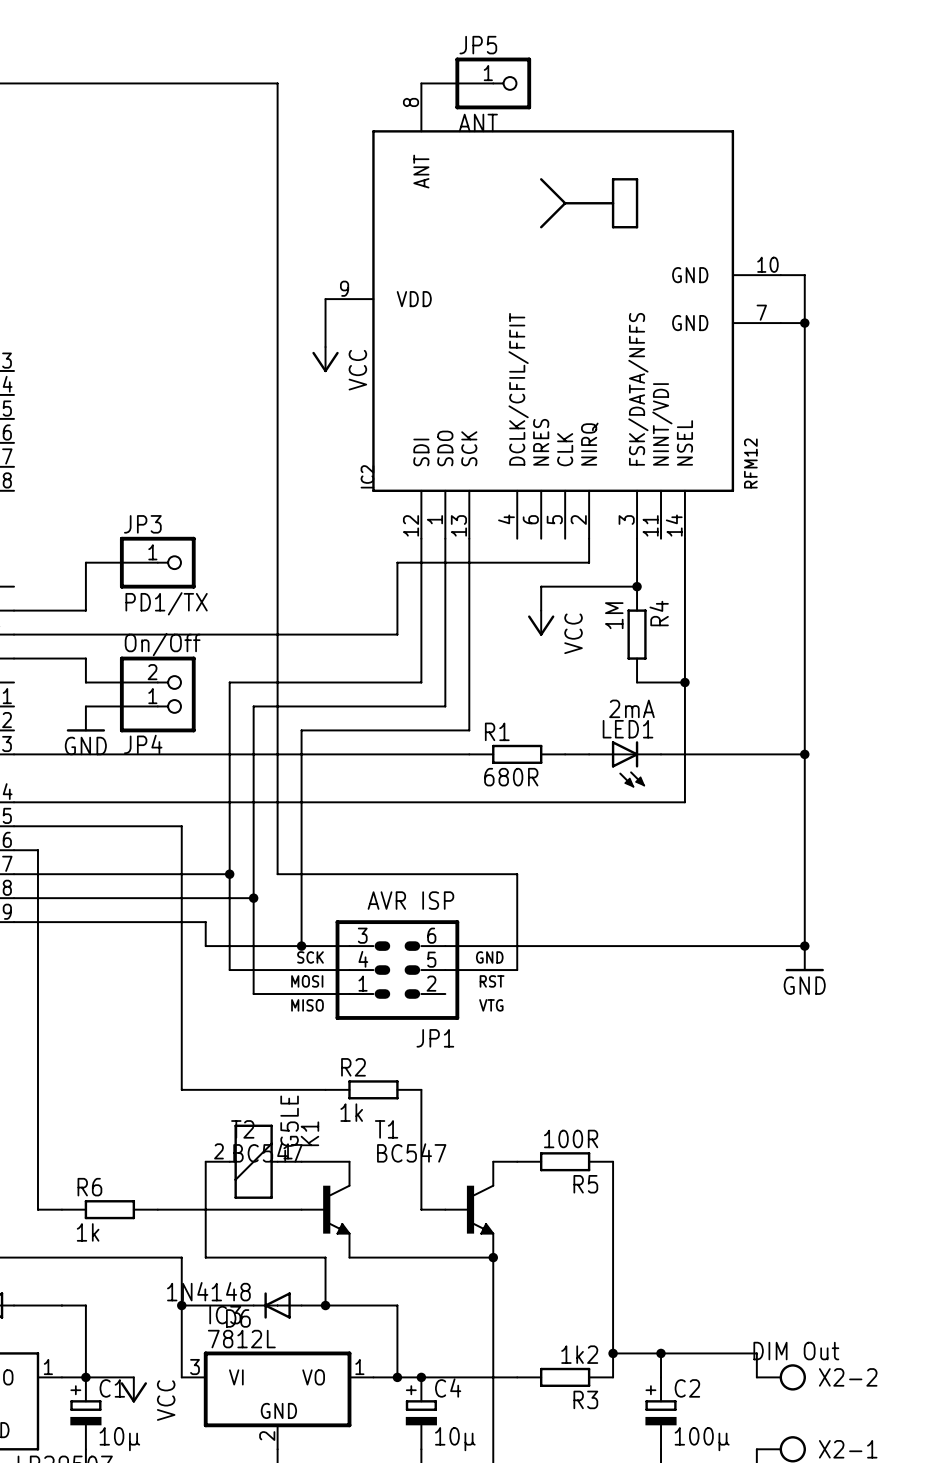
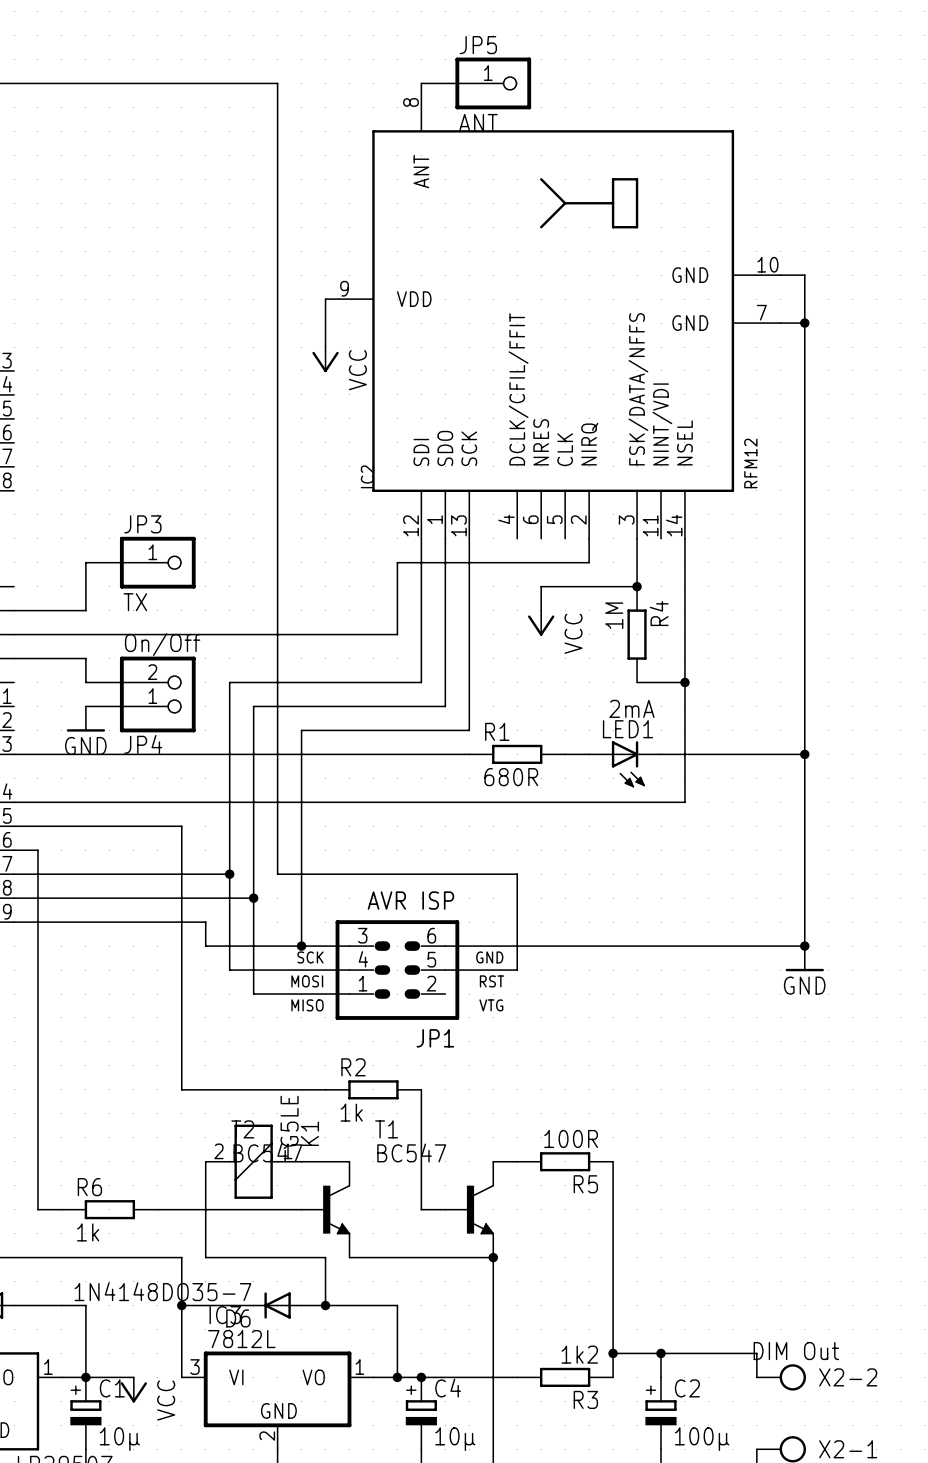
JP3 value: PD1/TX (166, 603) -> TX (135, 602)
D6 value: 1N4148 (208, 1291) -> 1N4148DO35-7 (162, 1291)

